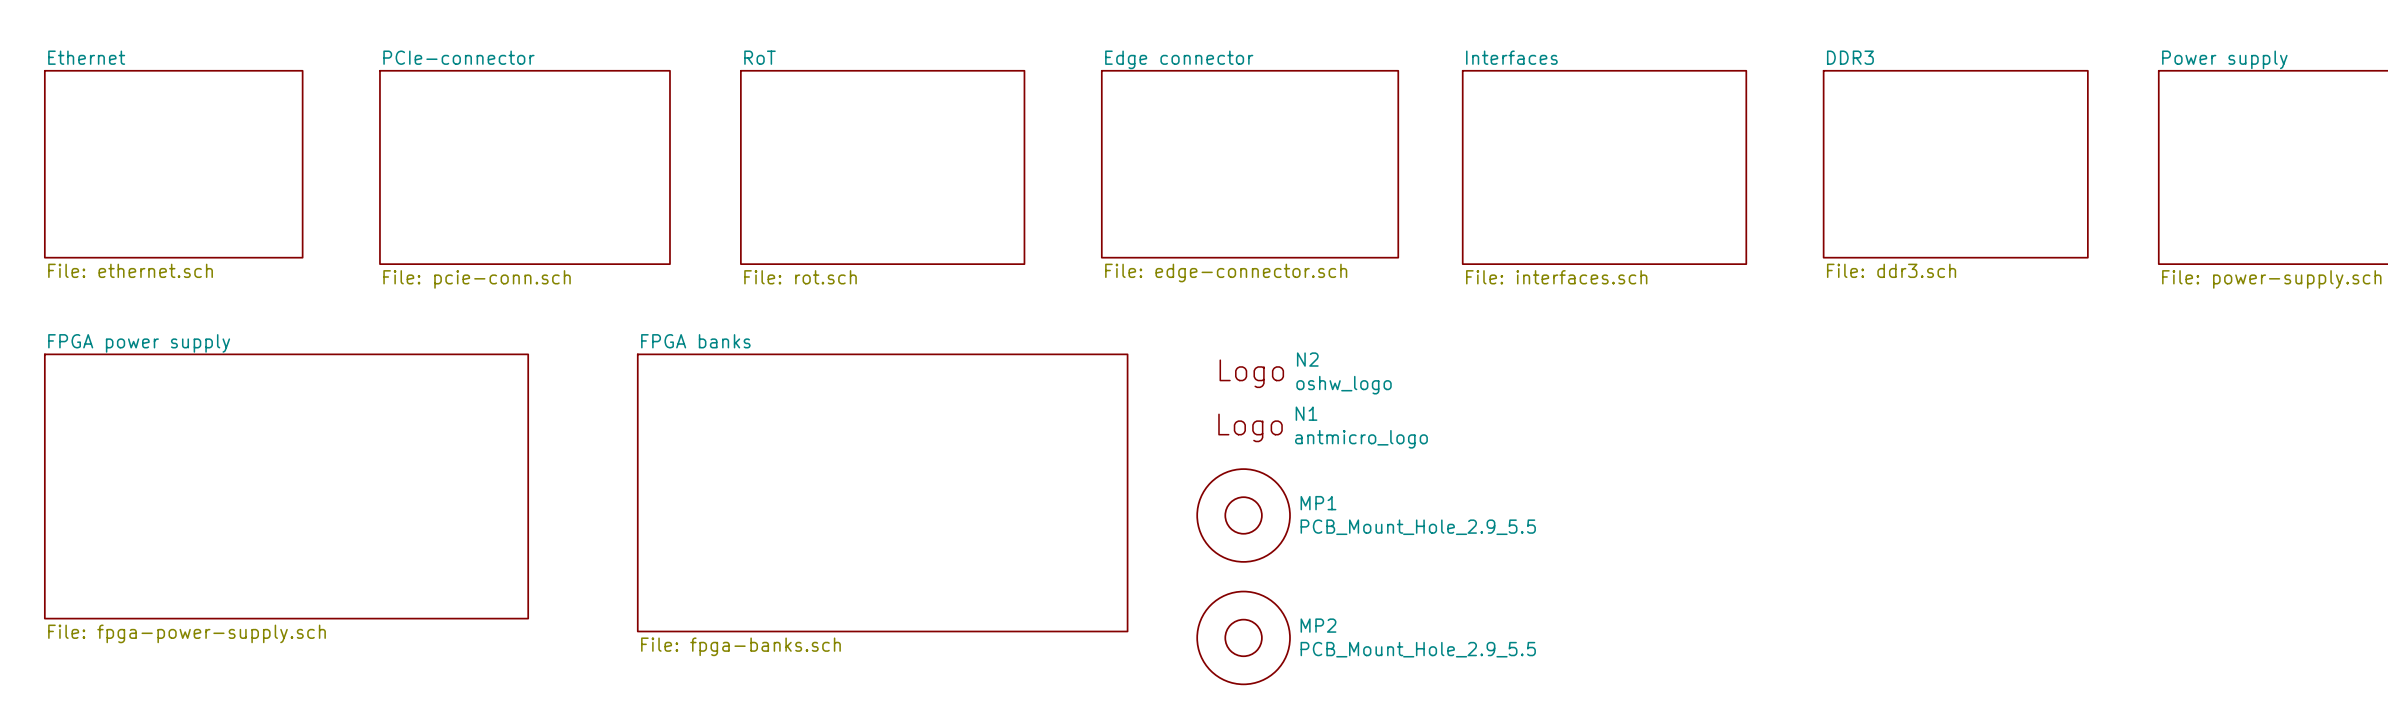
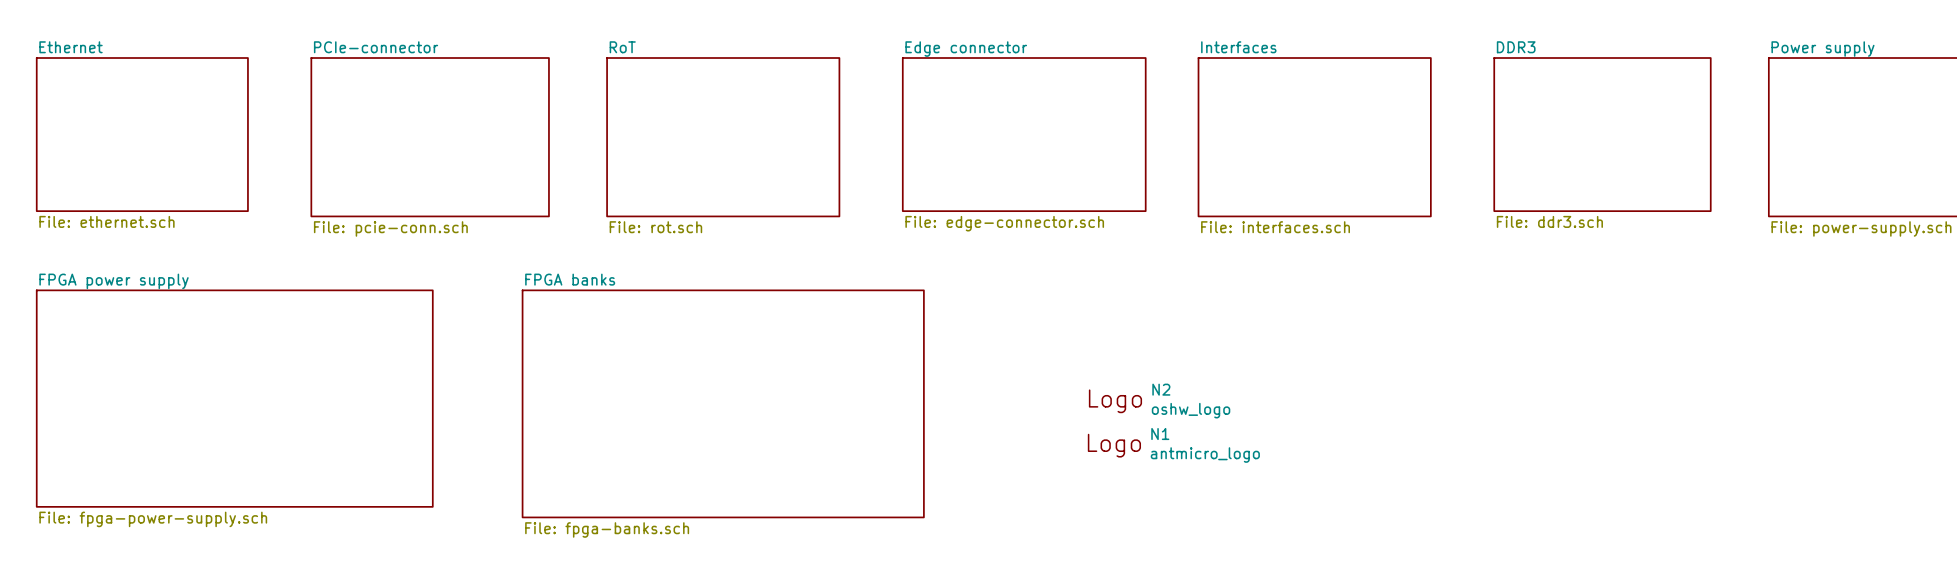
N2 position: (1305, 373) -> (1159, 401)
N1 position: (1323, 427) -> (1173, 445)
MP1: PCB_Mount_Hole_2.9_5.5 (1243, 515) -> none
MP2: PCB_Mount_Hole_2.9_5.5 (1243, 637) -> none

